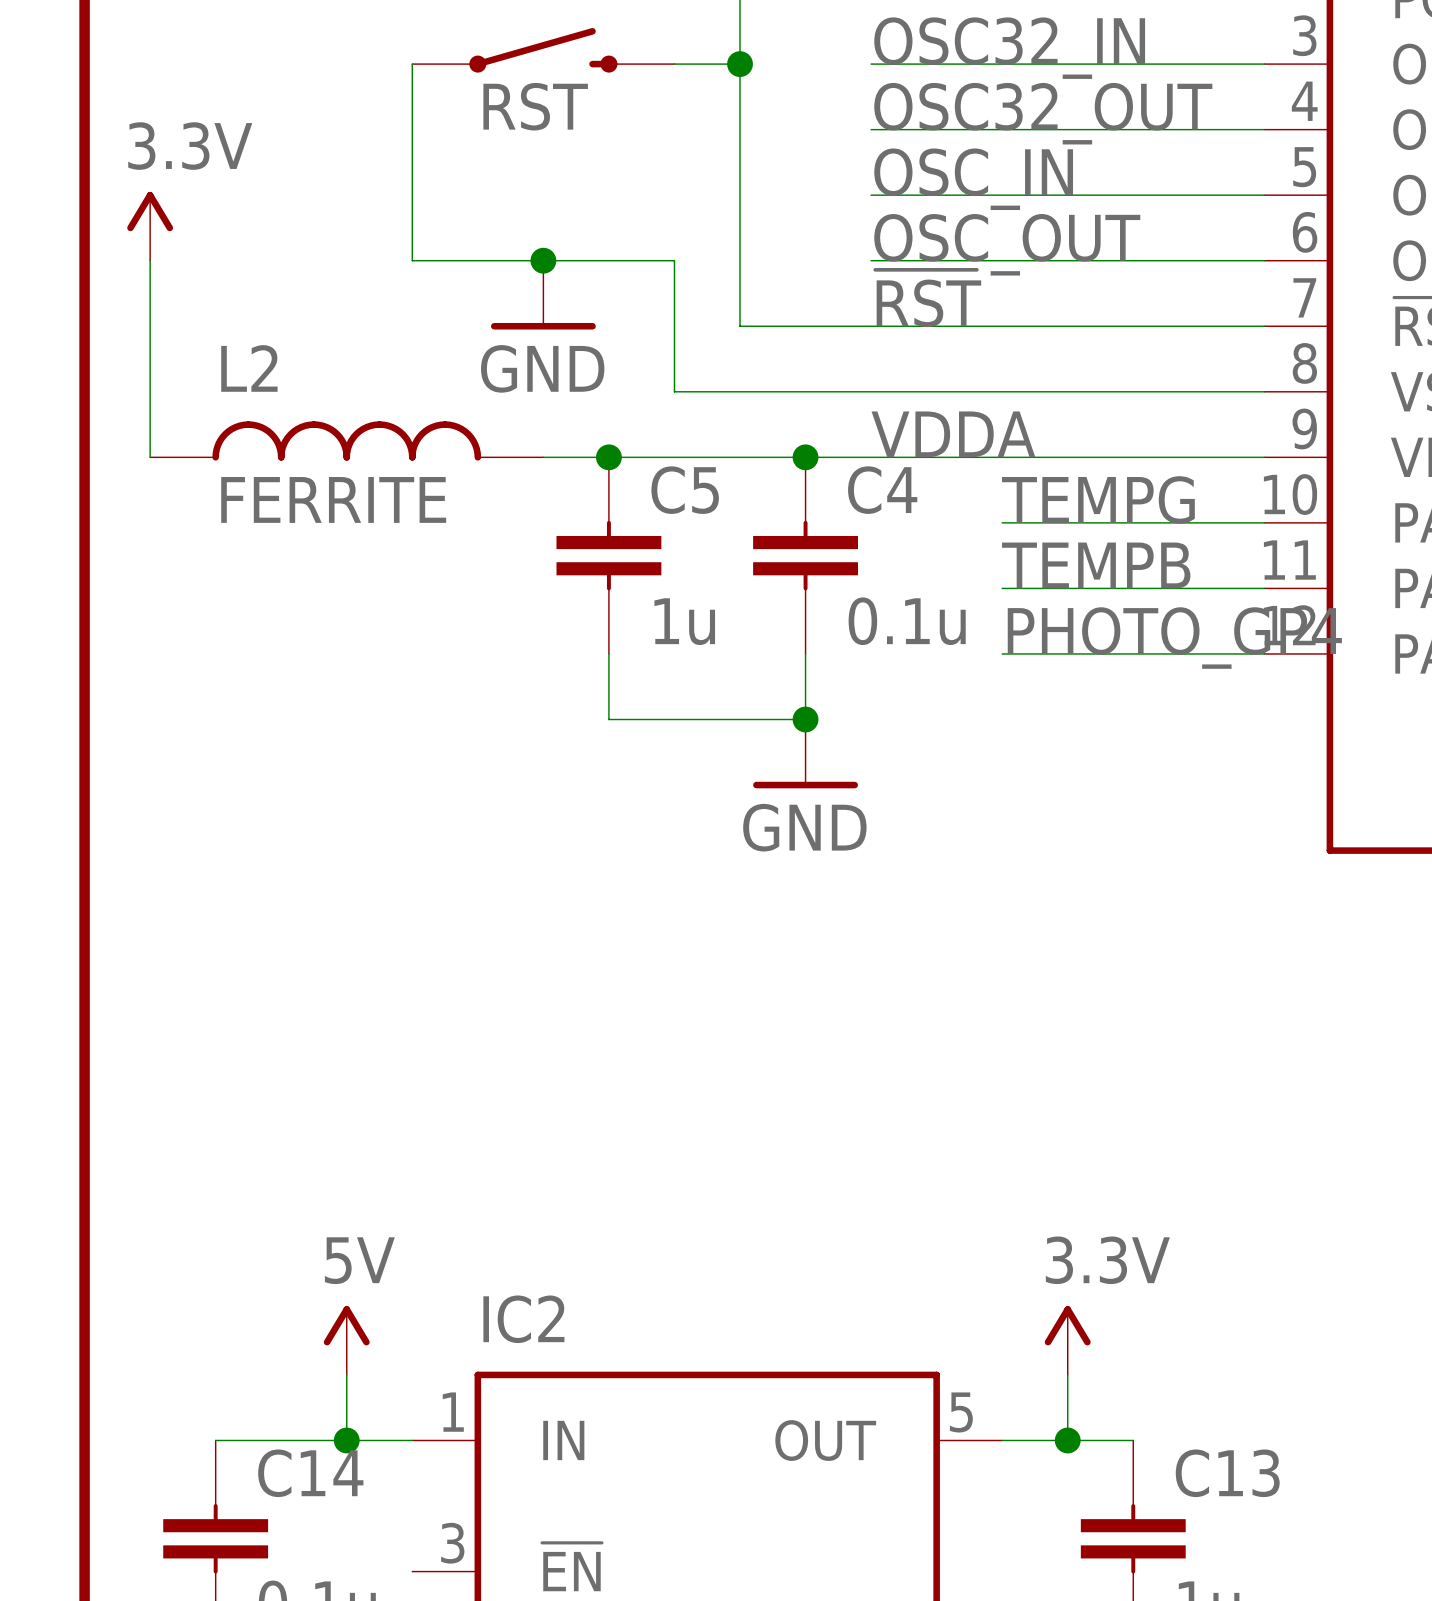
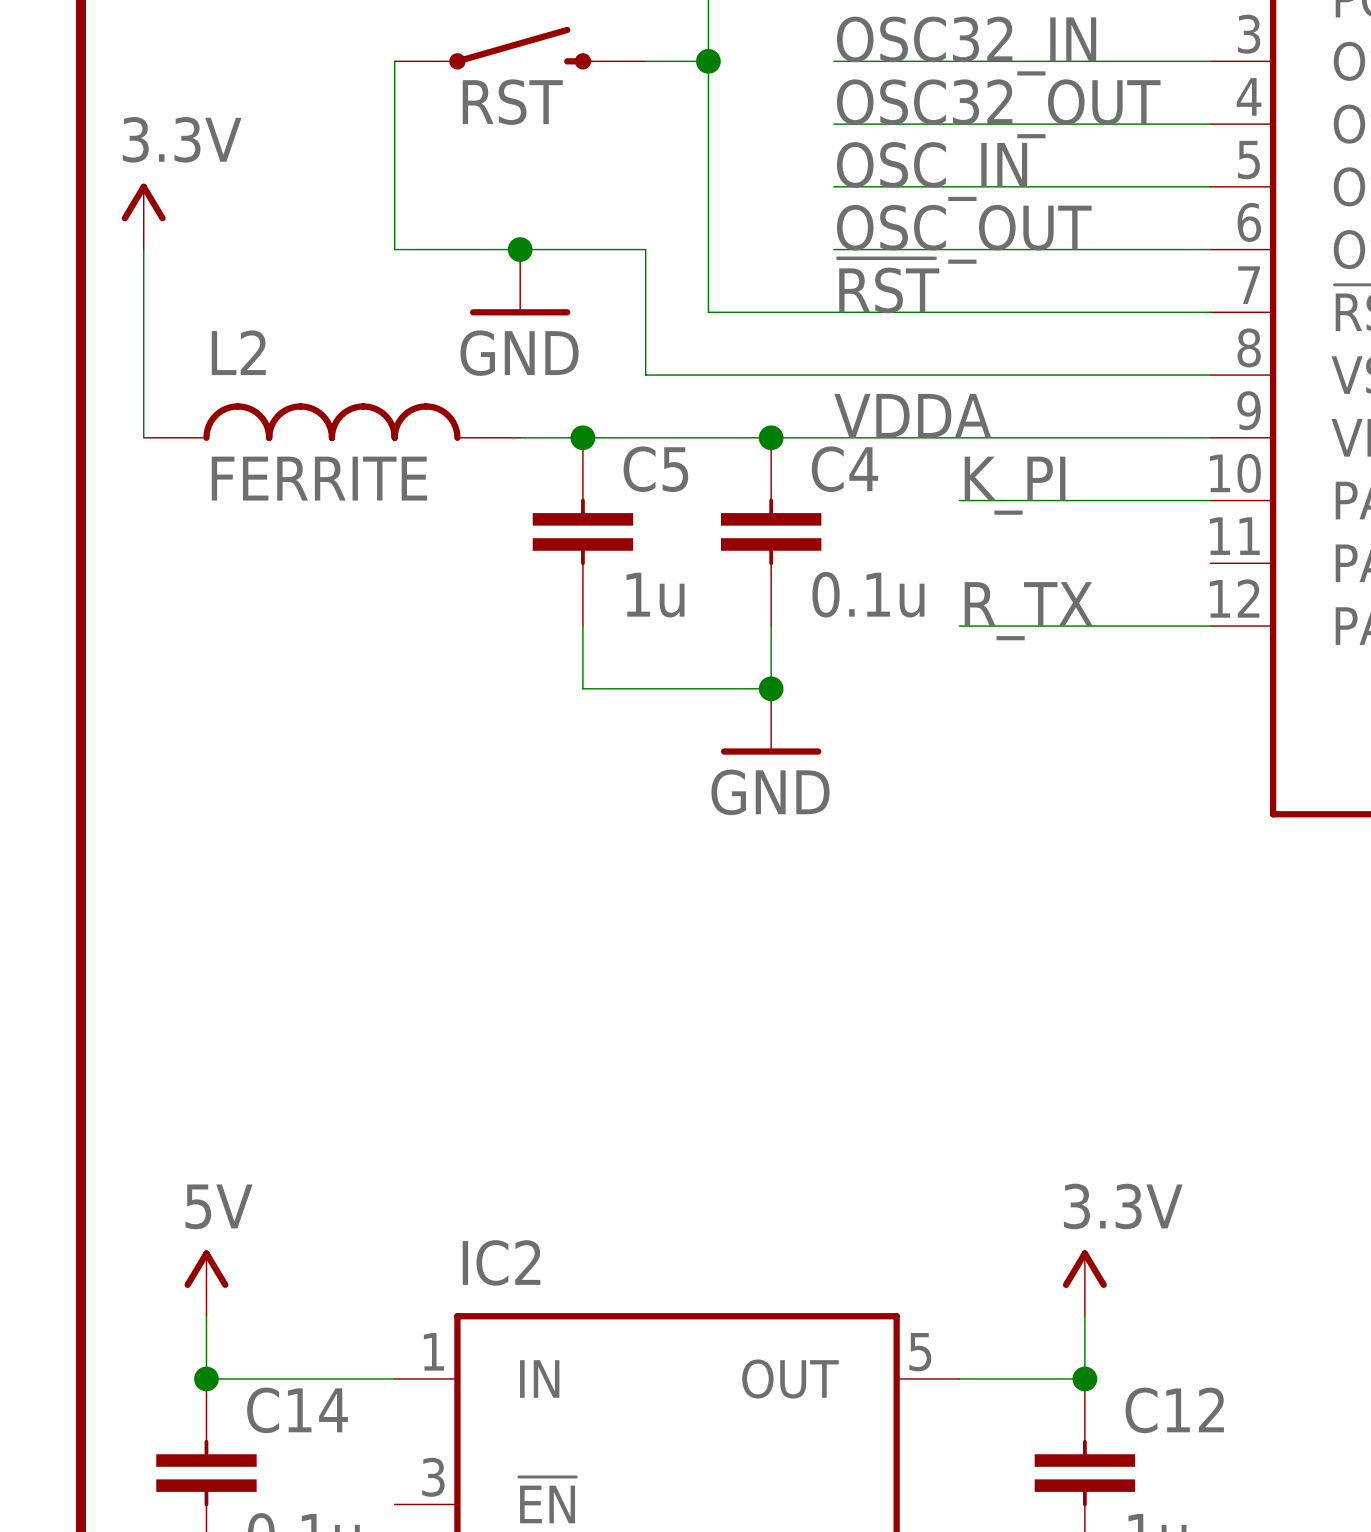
label: TEMPG (1098, 499) -> K_PI (1015, 485)
label: TEMPB (1096, 565) -> none
wire: (1002, 588) (1264, 588) -> none
label: PHOTO_GP4 (1174, 638) -> R_TX (1028, 611)
power symbol position: 5V (346, 1340) -> 5V (206, 1283)
power symbol position: 3.3V (1067, 1340) -> 3.3V (1084, 1283)
wire: (346, 1374) (346, 1440) -> (206, 1316) (206, 1378)
wire: (1067, 1374) (1067, 1440) -> (1084, 1316) (1084, 1378)
junction position: (346, 1440) -> (206, 1378)
junction position: (1067, 1440) -> (1084, 1378)
C13 name: C13 (1227, 1473) -> C12 (1174, 1410)

